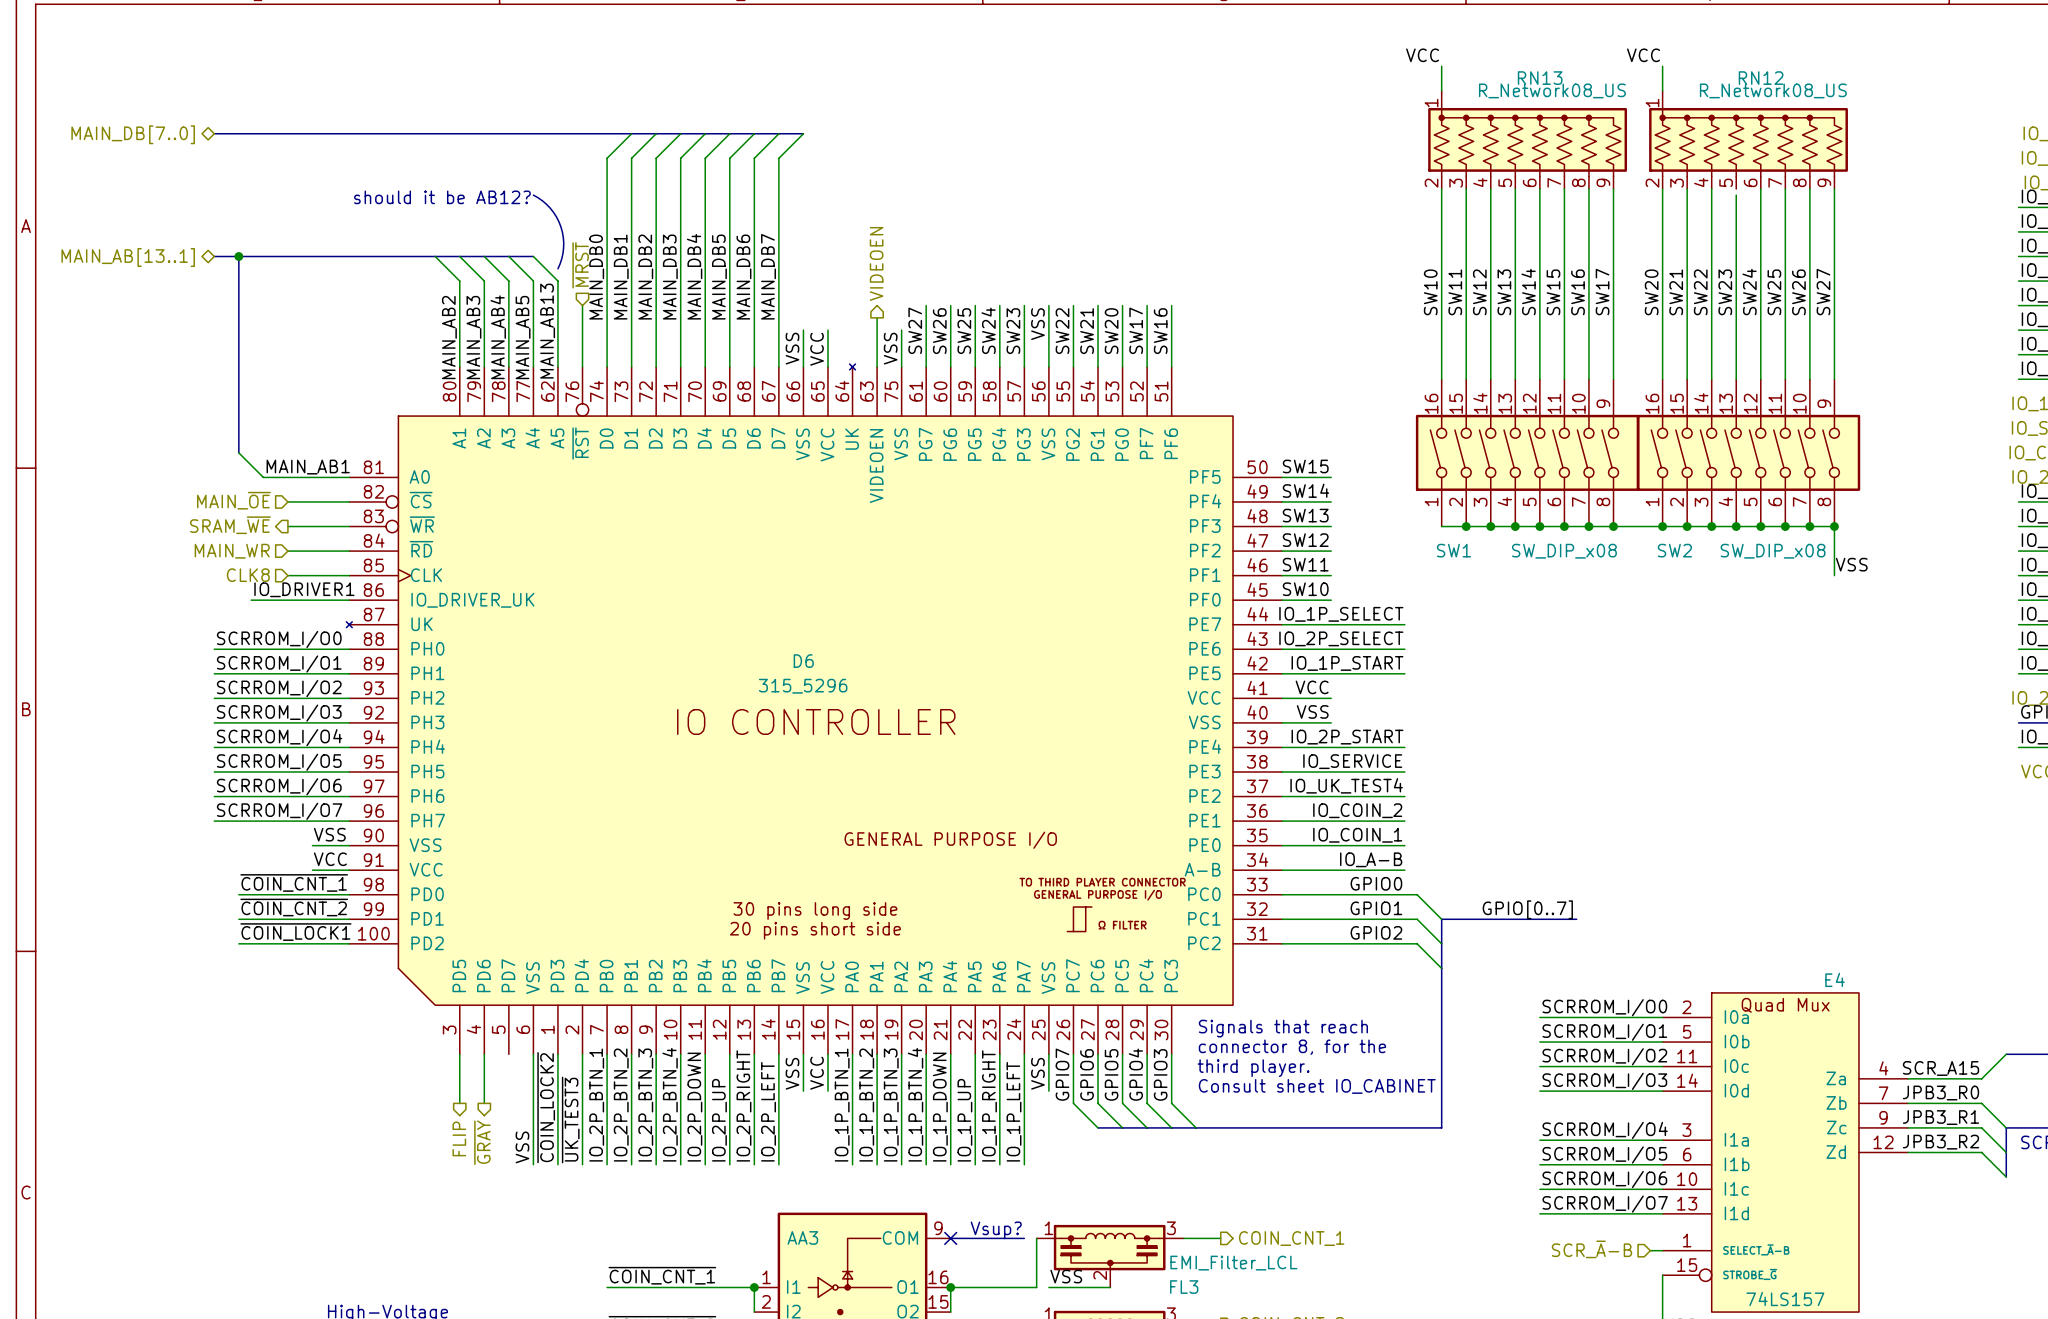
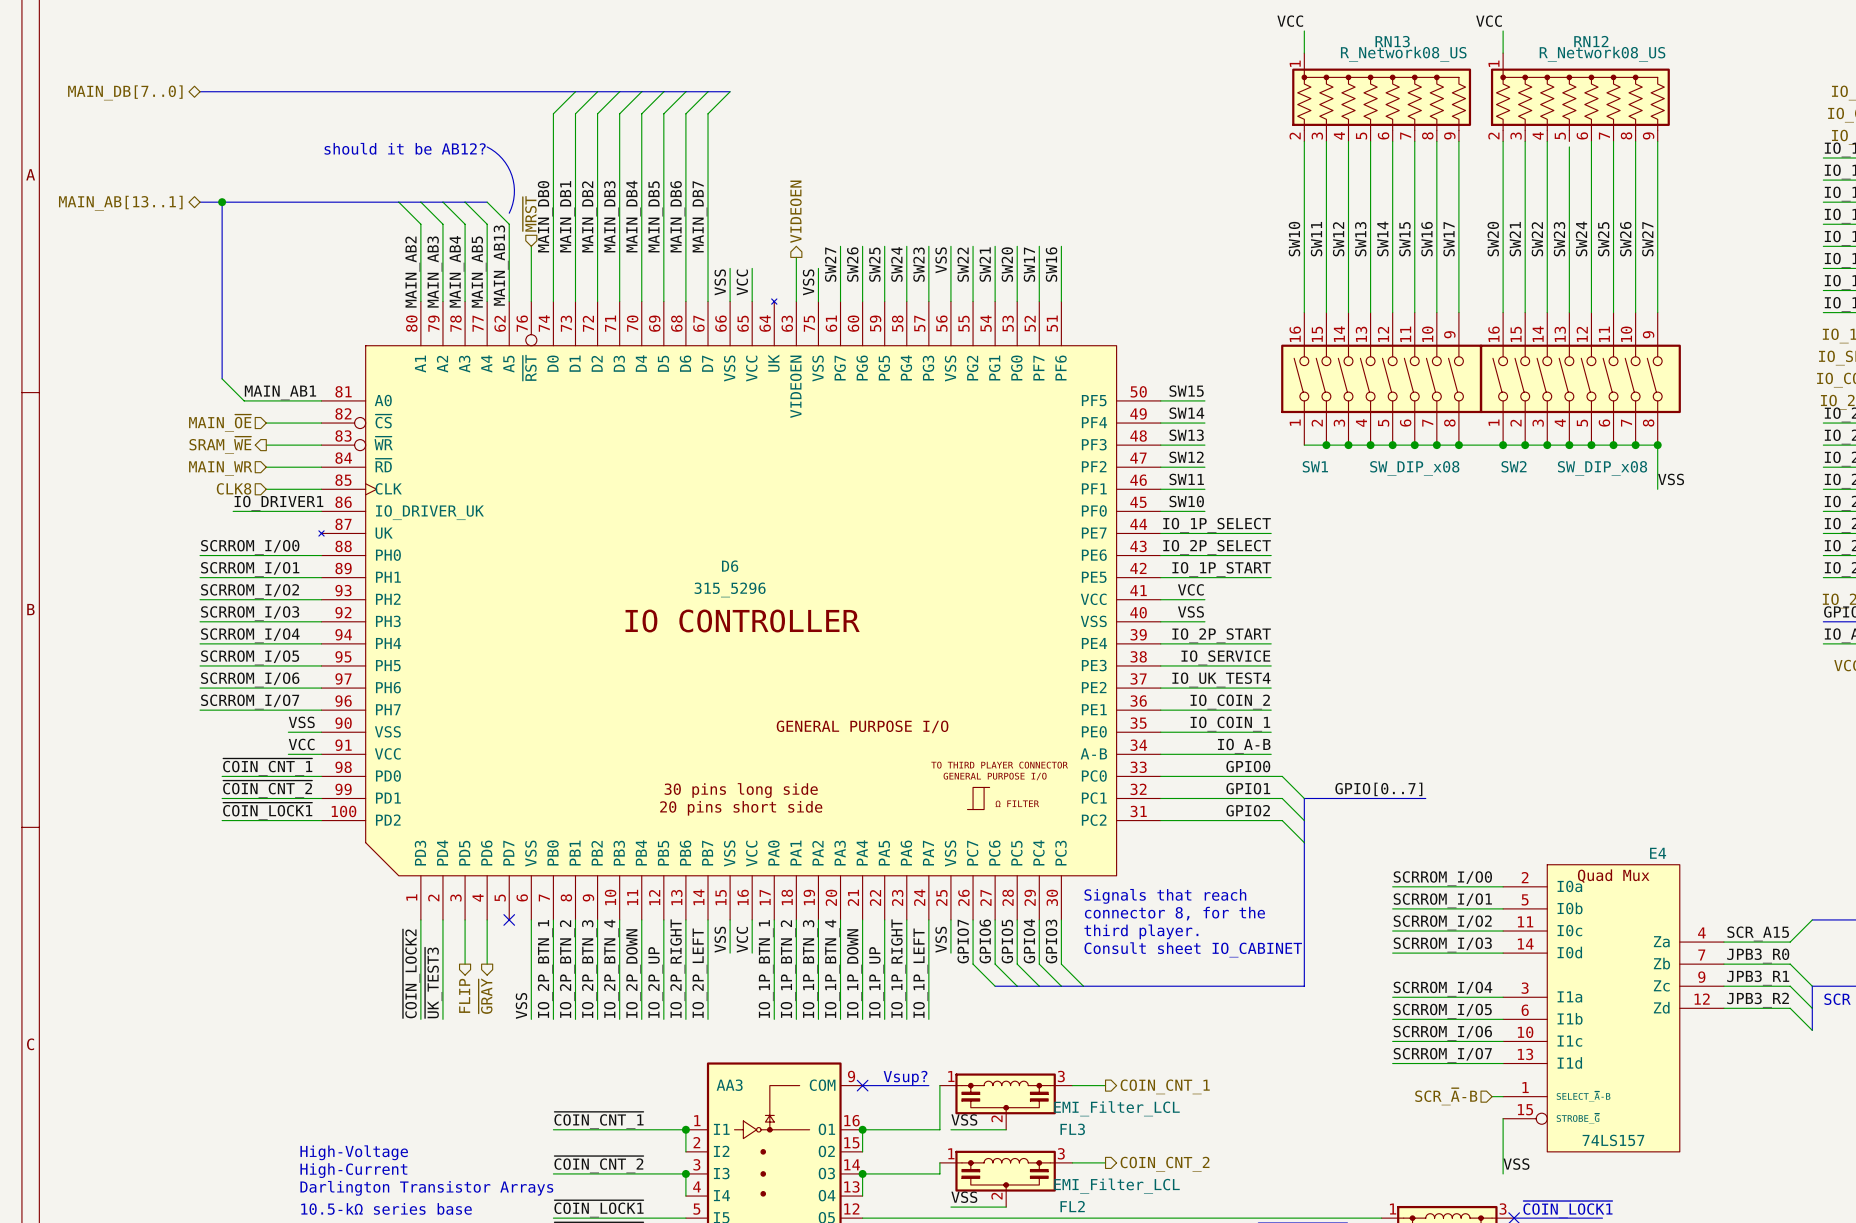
D6 symbol: [346, 364, 1283, 1055] -> [318, 298, 1161, 920]
wire: none -> (465, 919) (465, 964)
wire: (557, 1054) (557, 1164) -> none
no-connect mark: none -> (509, 919)
wire: none -> (420, 964) (420, 1019)
wire: (533, 1103) (533, 1164) -> (442, 964) (442, 1019)
label position: ~{COIN_LOCK2} (546, 1107) -> ~{COIN_LOCK2} (411, 973)
label: none -> ~{UK_TEST3} (433, 982)
label: ~{UK_TEST3} (570, 1119) -> VSS (521, 1005)
hierarchical label position: FLIP (459, 1138) -> FLIP (464, 995)
hierarchical label position: ~{GRAY} (482, 1142) -> ~{GRAY} (485, 996)
label: VSS (522, 1147) -> none

